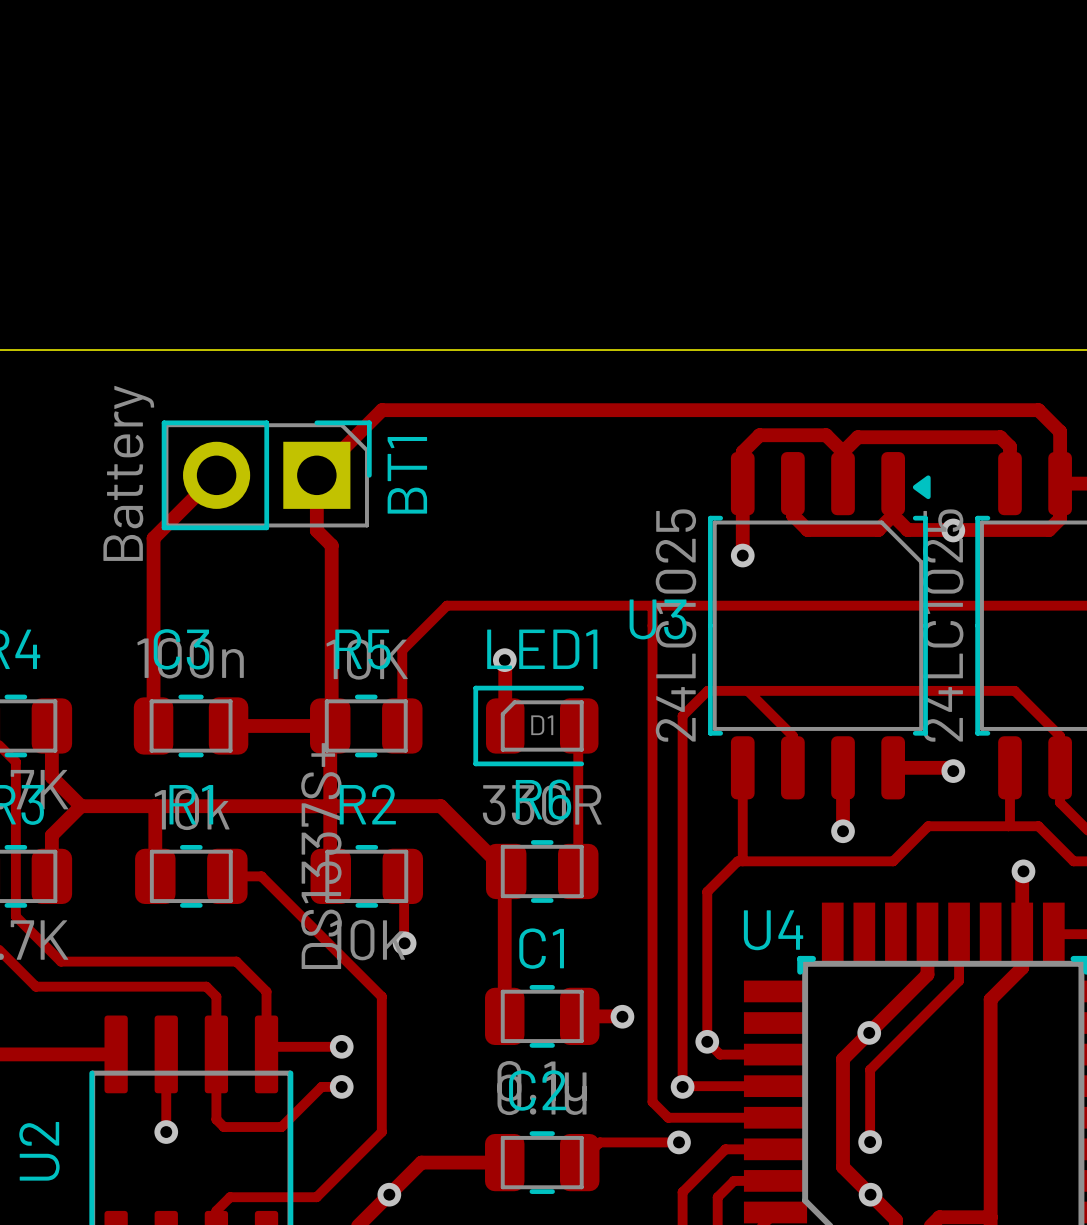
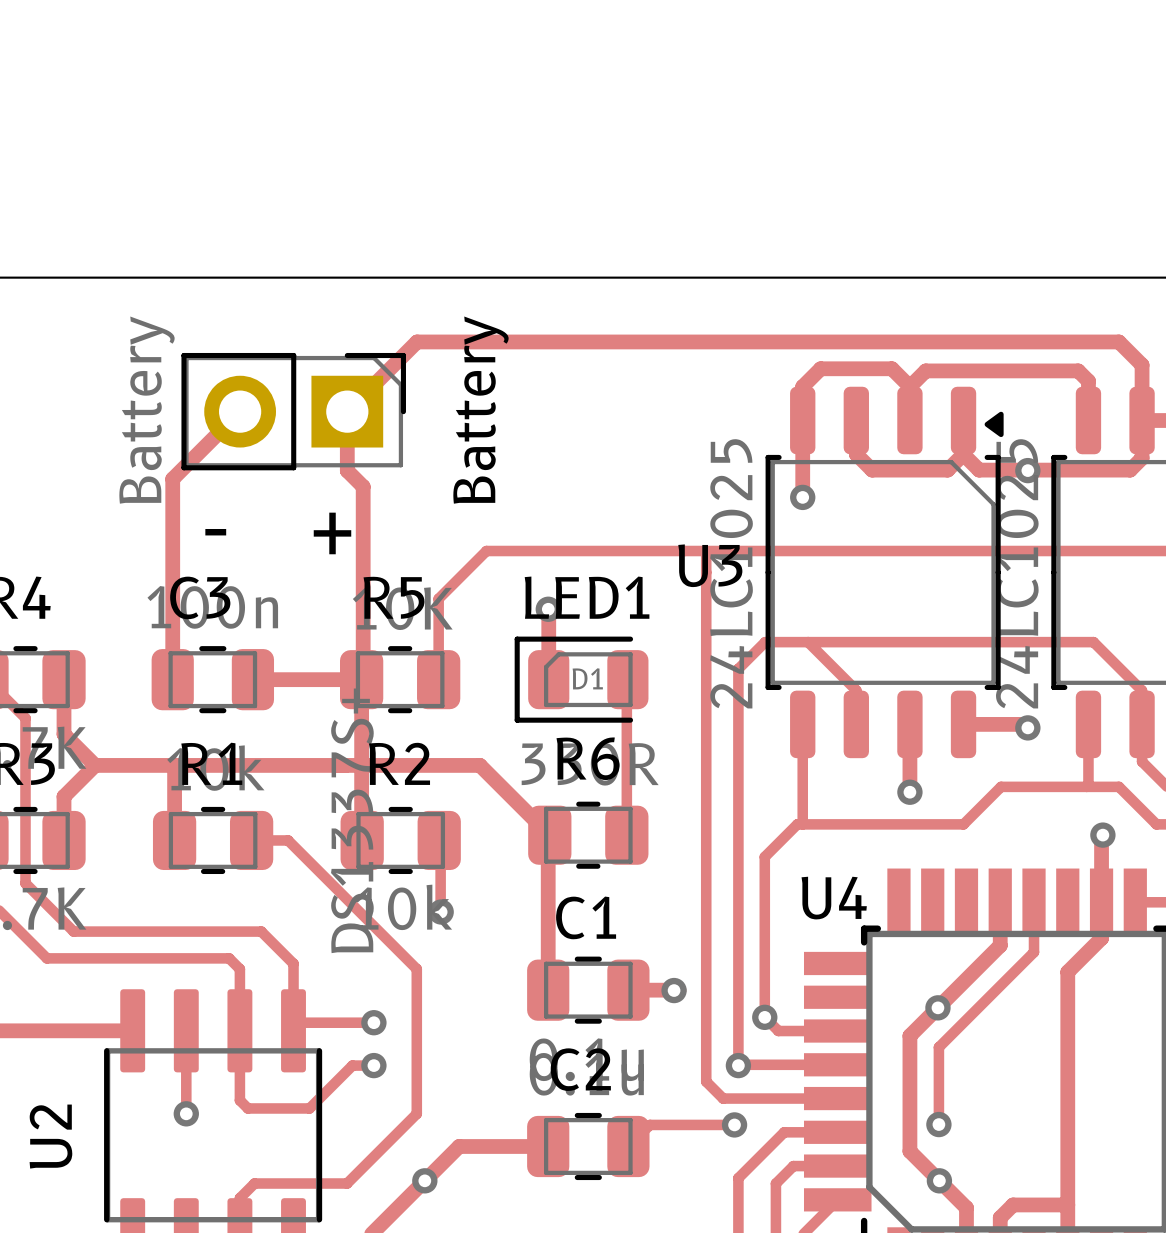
BT1 name: BT1 (407, 475) -> Battery (480, 410)
text: none -> - (215, 532)
text: none -> + (332, 533)

